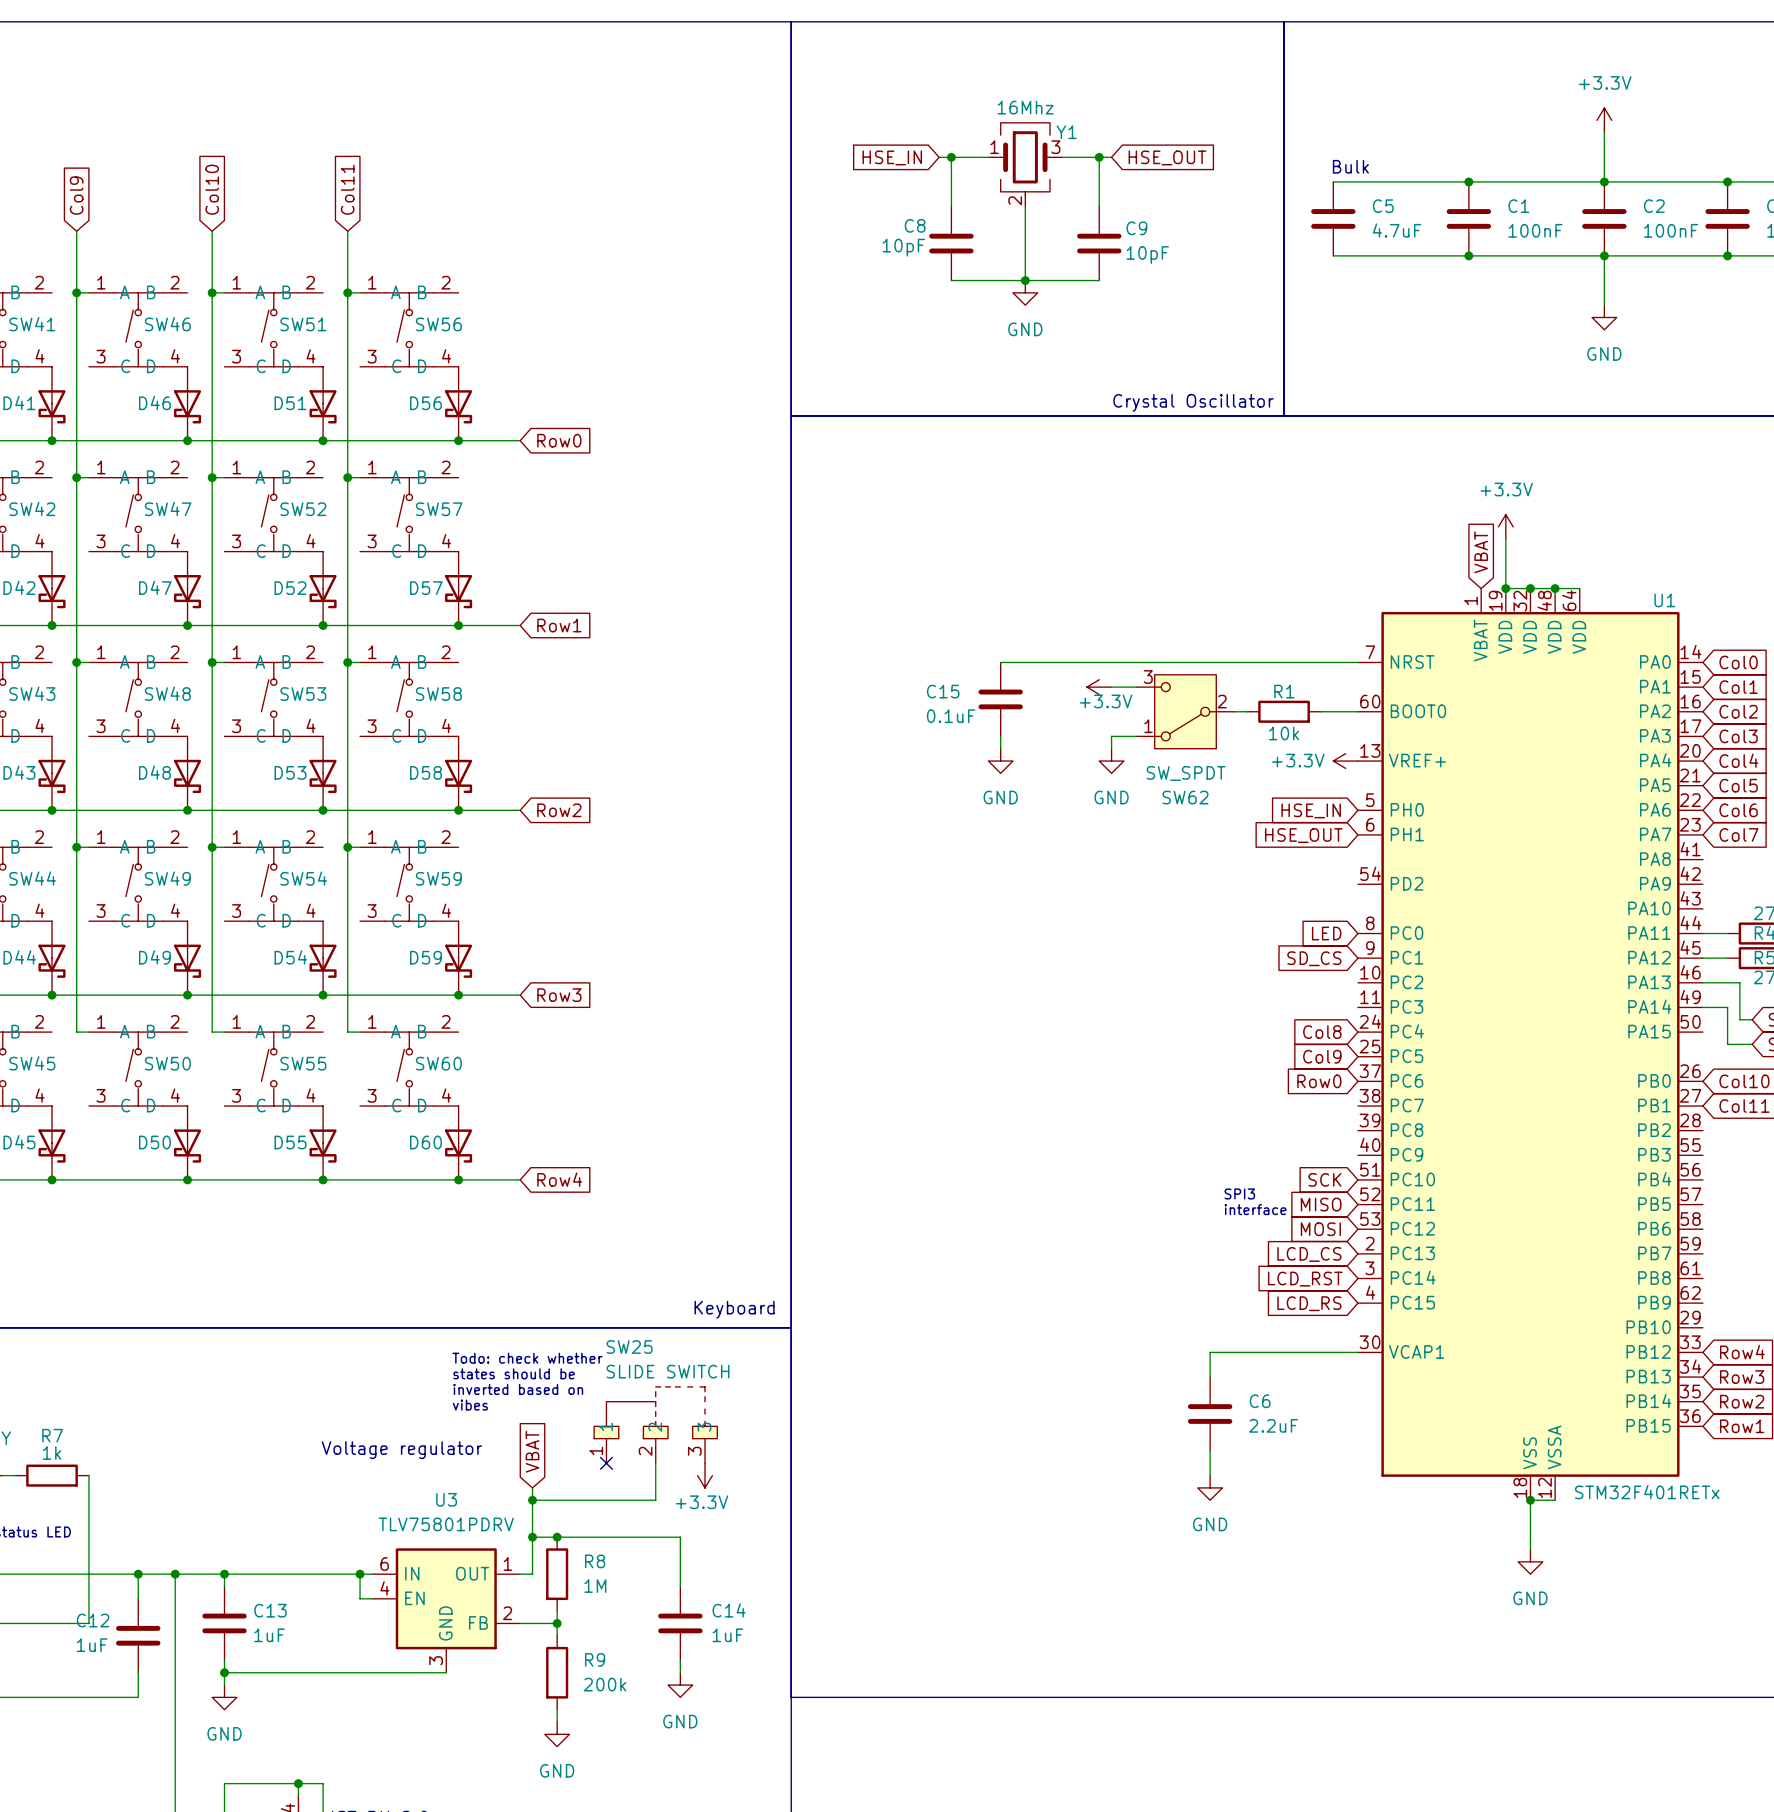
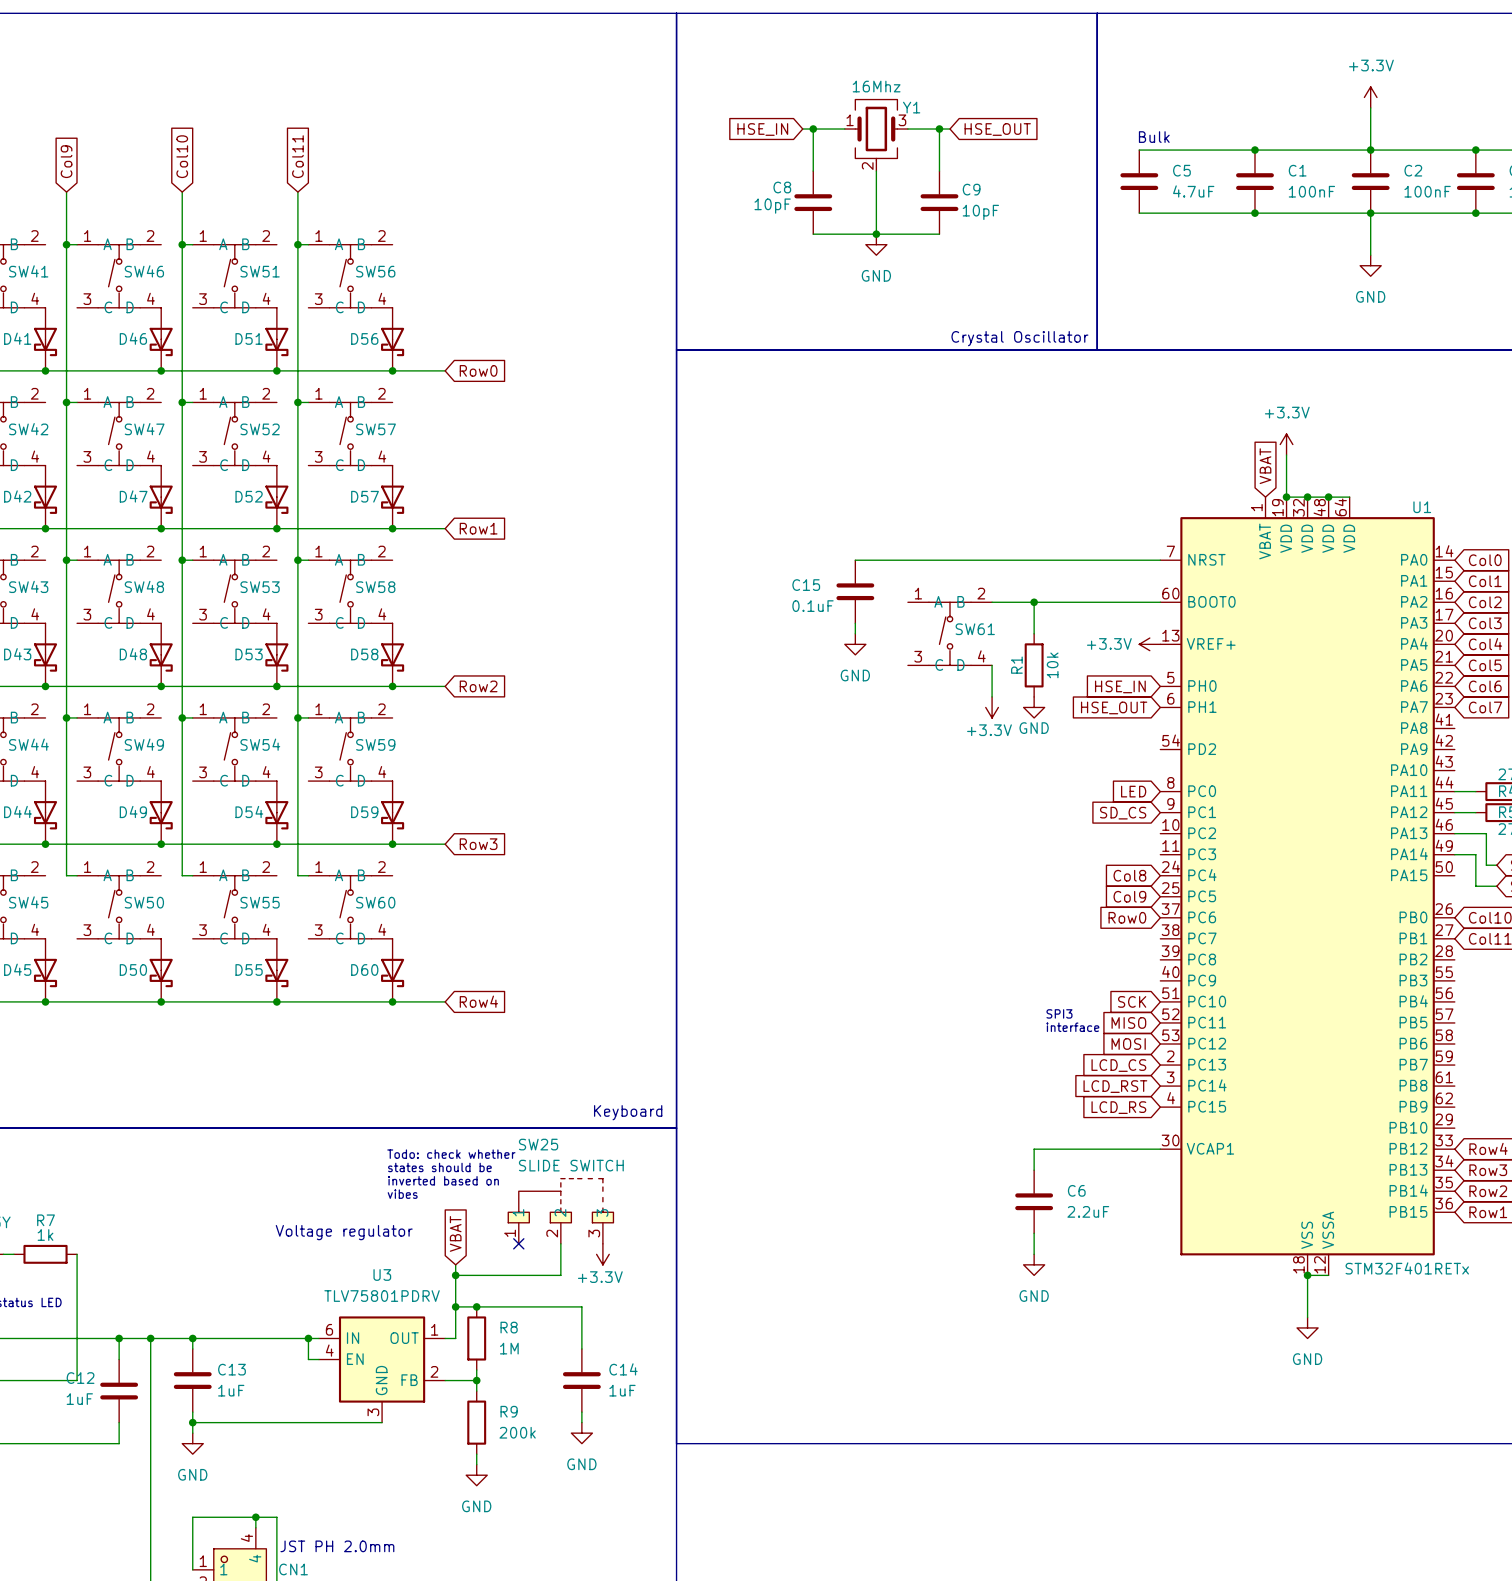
power symbol rotation: 0° (1099, 687) -> 90° counterclockwise (992, 707)
power symbol position: +3.3V (1099, 687) -> +3.3V (992, 707)
wire: (1111, 687) (1136, 687) -> none
R1 name position: R1 (1284, 691) -> R1 (1016, 665)
SW62: SW_SPDT (1185, 711) -> none
junction: none -> (1034, 602)
wire: none -> (1065, 602) (1128, 602)
R1 rotation: 0° (1284, 711) -> 90° clockwise (1034, 665)
R1 position: (1284, 711) -> (1034, 665)
R1 value position: 10k (1284, 733) -> 10k (1052, 665)
wire: (1136, 736) (1111, 736) (1111, 748) -> none
SW61: none -> (949, 633)
power symbol position: GND (1111, 761) -> GND (1034, 707)
wire: none -> (992, 665) (992, 696)
power symbol text position: GND (1111, 797) -> GND (1034, 728)

